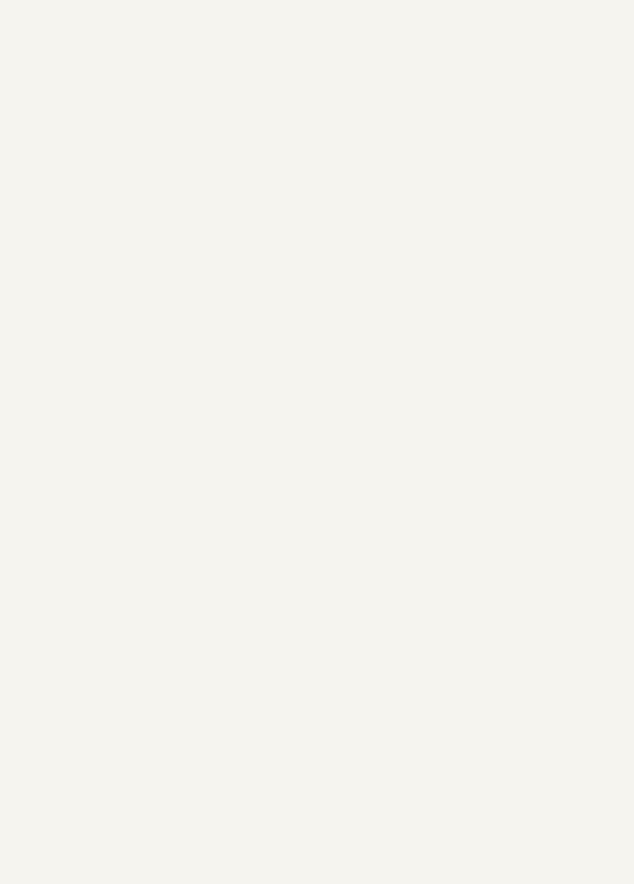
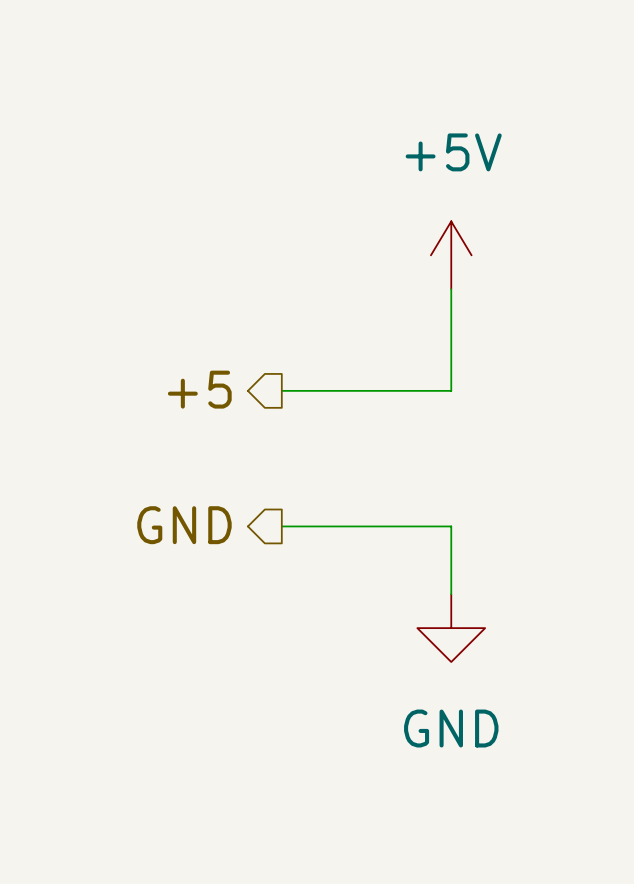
power symbol: none -> +5V (451, 255)
wire: none -> (451, 289) (451, 390) (281, 390)
hierarchical label: none -> +5 (199, 389)
hierarchical label: none -> GND (184, 525)
wire: none -> (281, 526) (451, 526) (451, 594)
power symbol: none -> GND (451, 628)

